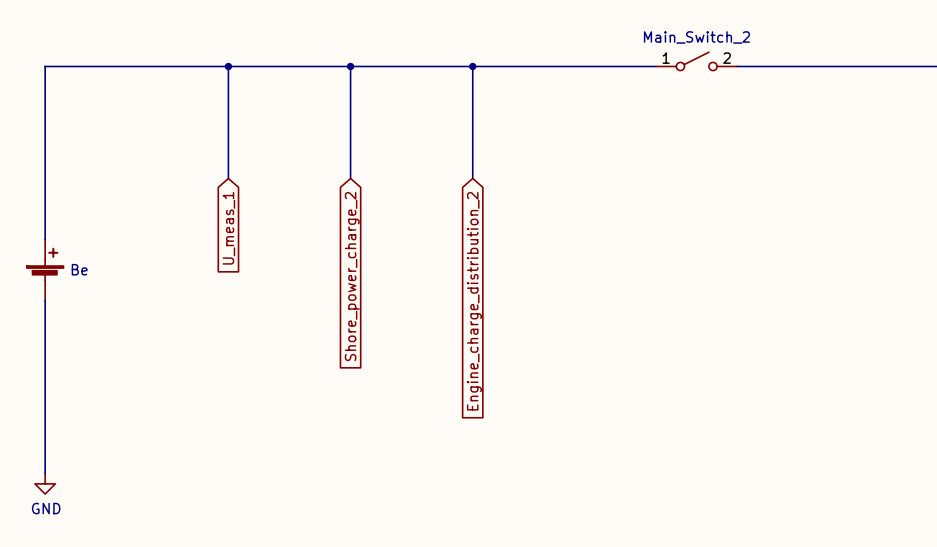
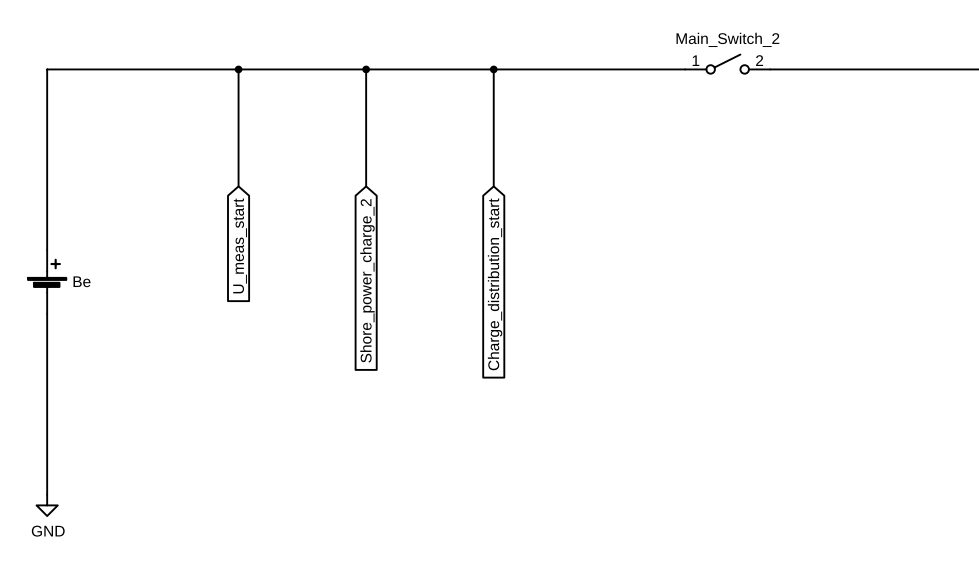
global label: U_meas_1 (228, 228) -> U_meas_start (240, 245)
global label: Engine_charge_distribution_2 (474, 301) -> Charge_distribution_start (495, 284)

